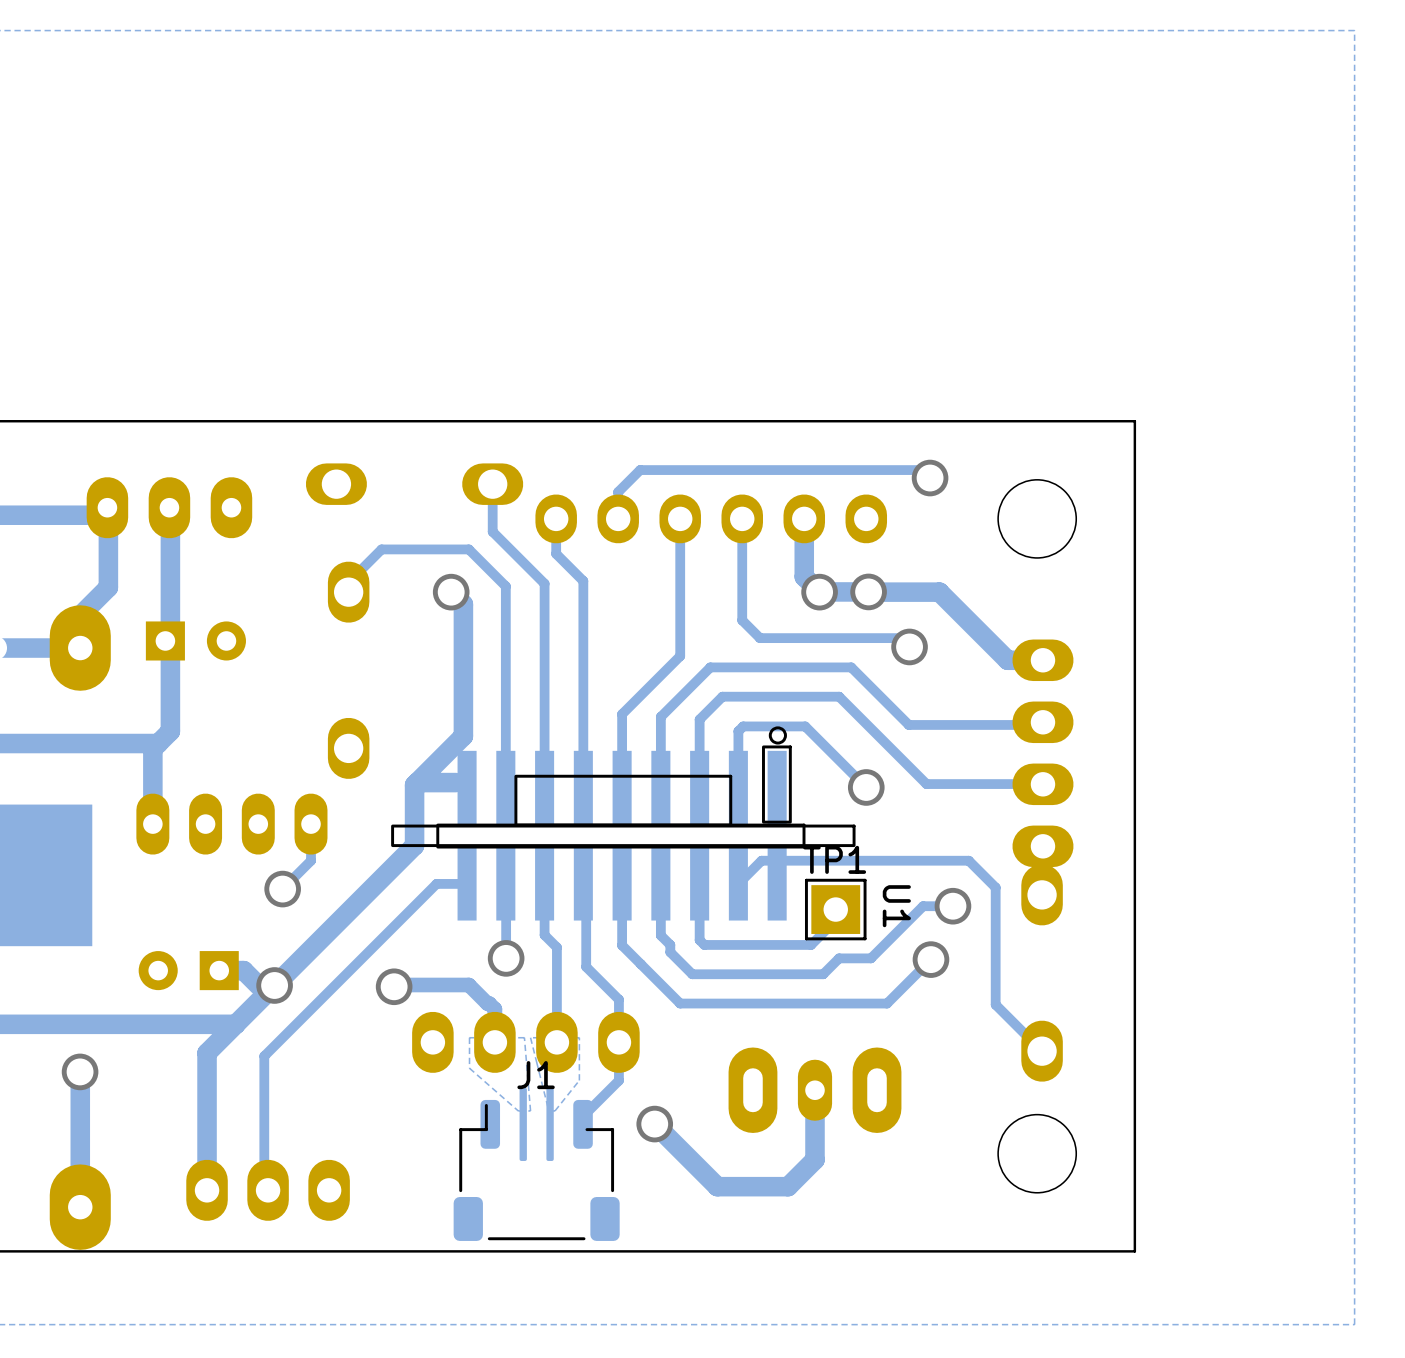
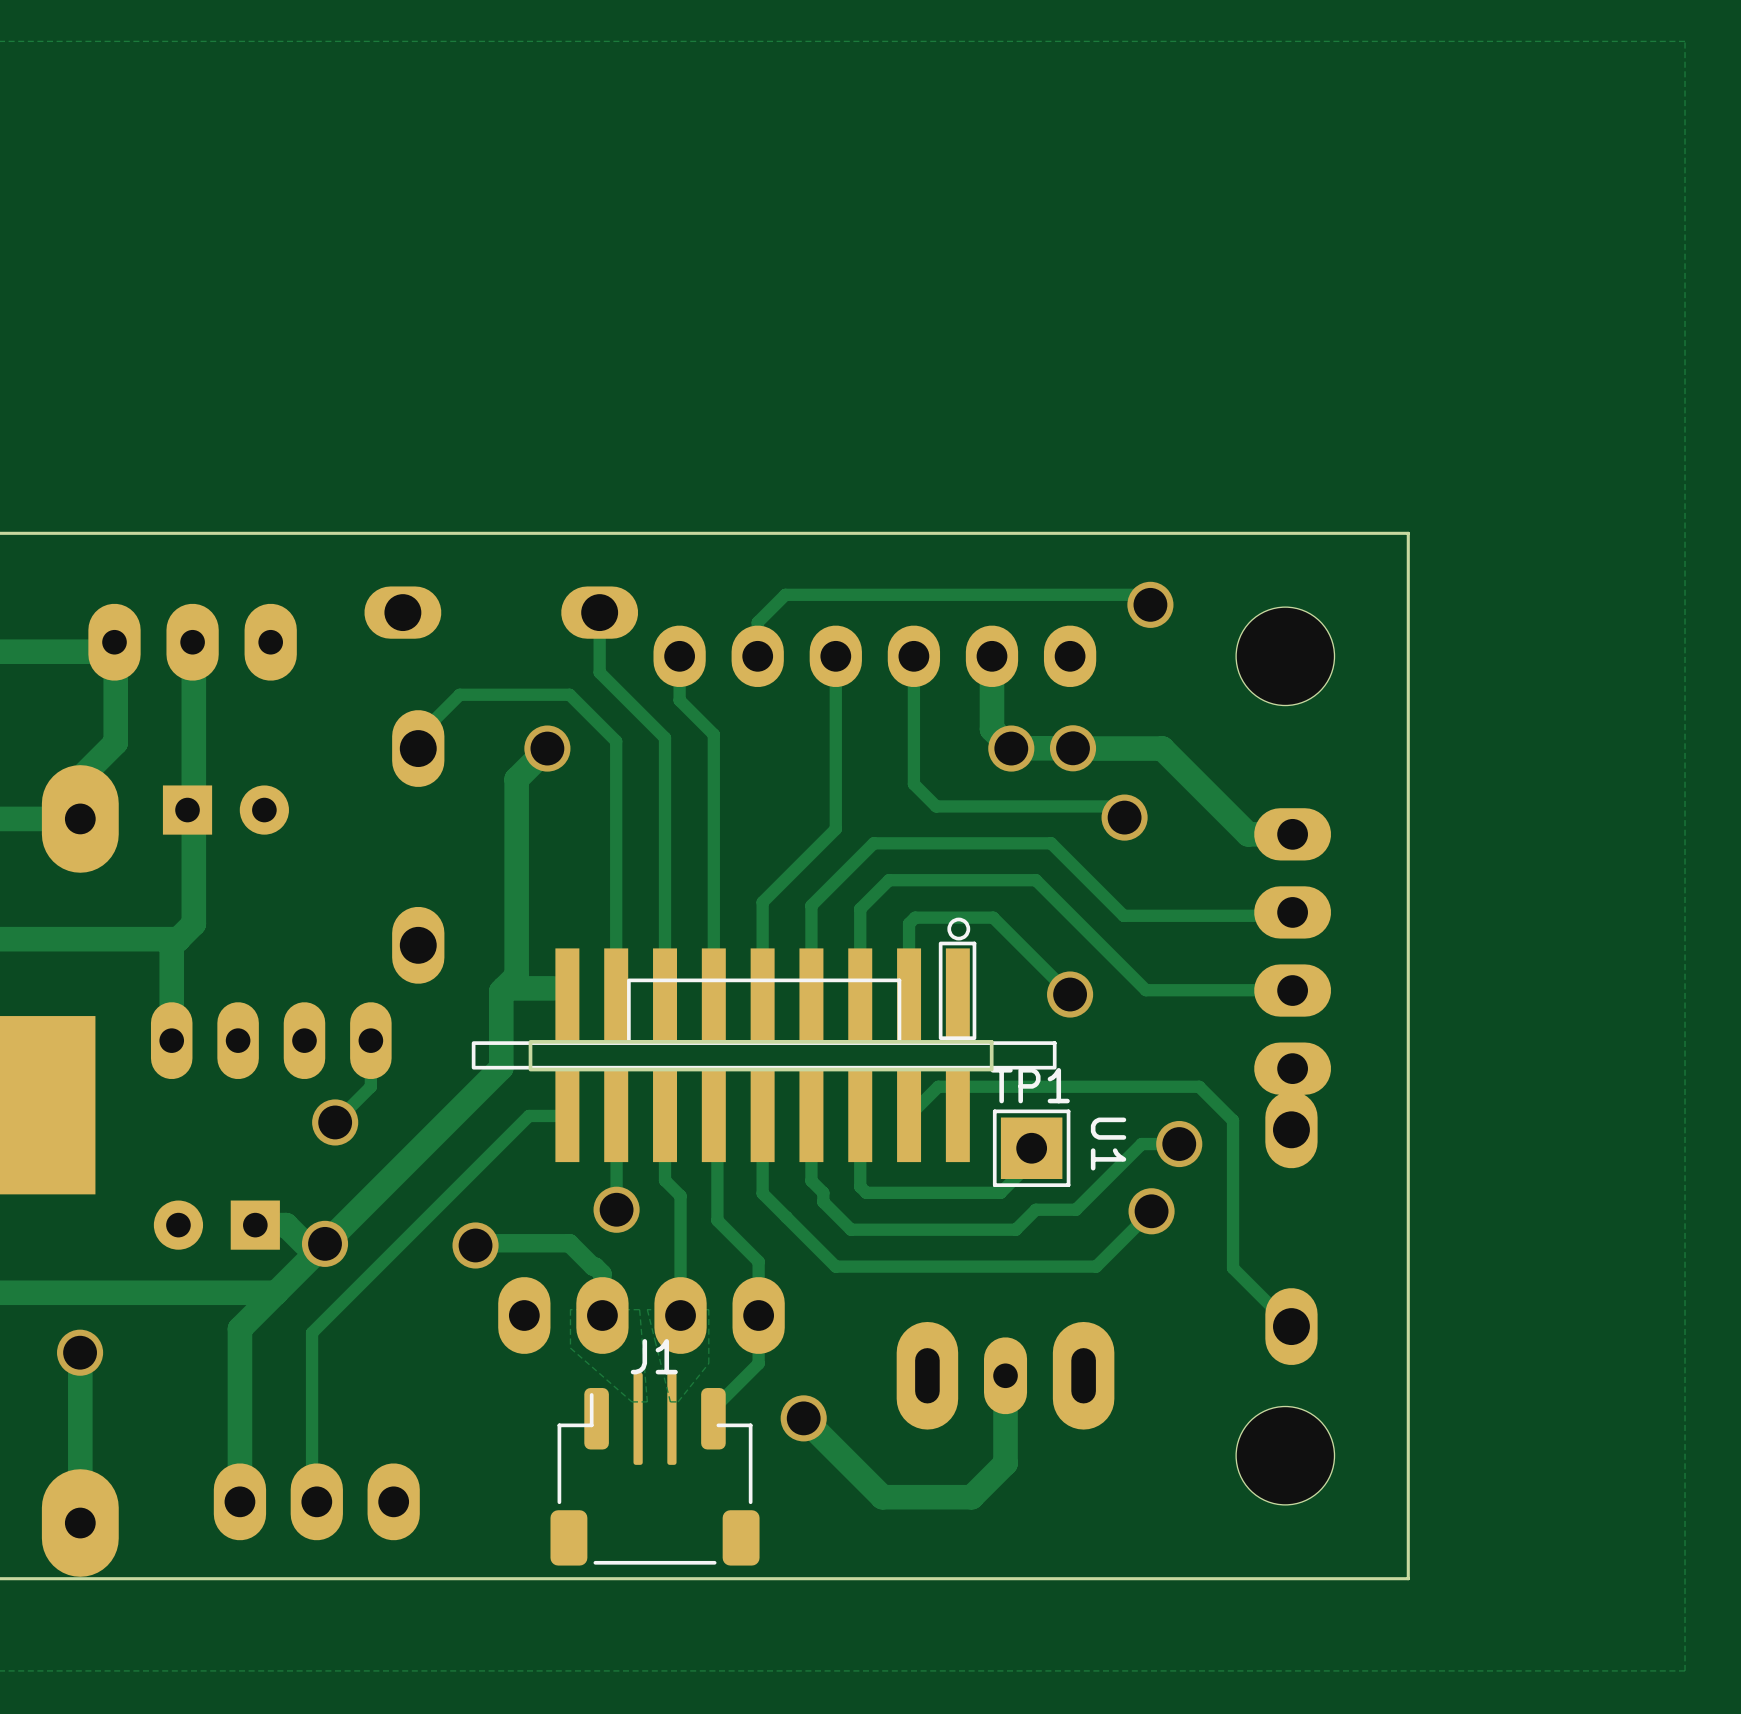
track: (451, 592) (463, 604) (463, 736) (426, 772) -> (547, 748) (516, 779) (516, 976)

